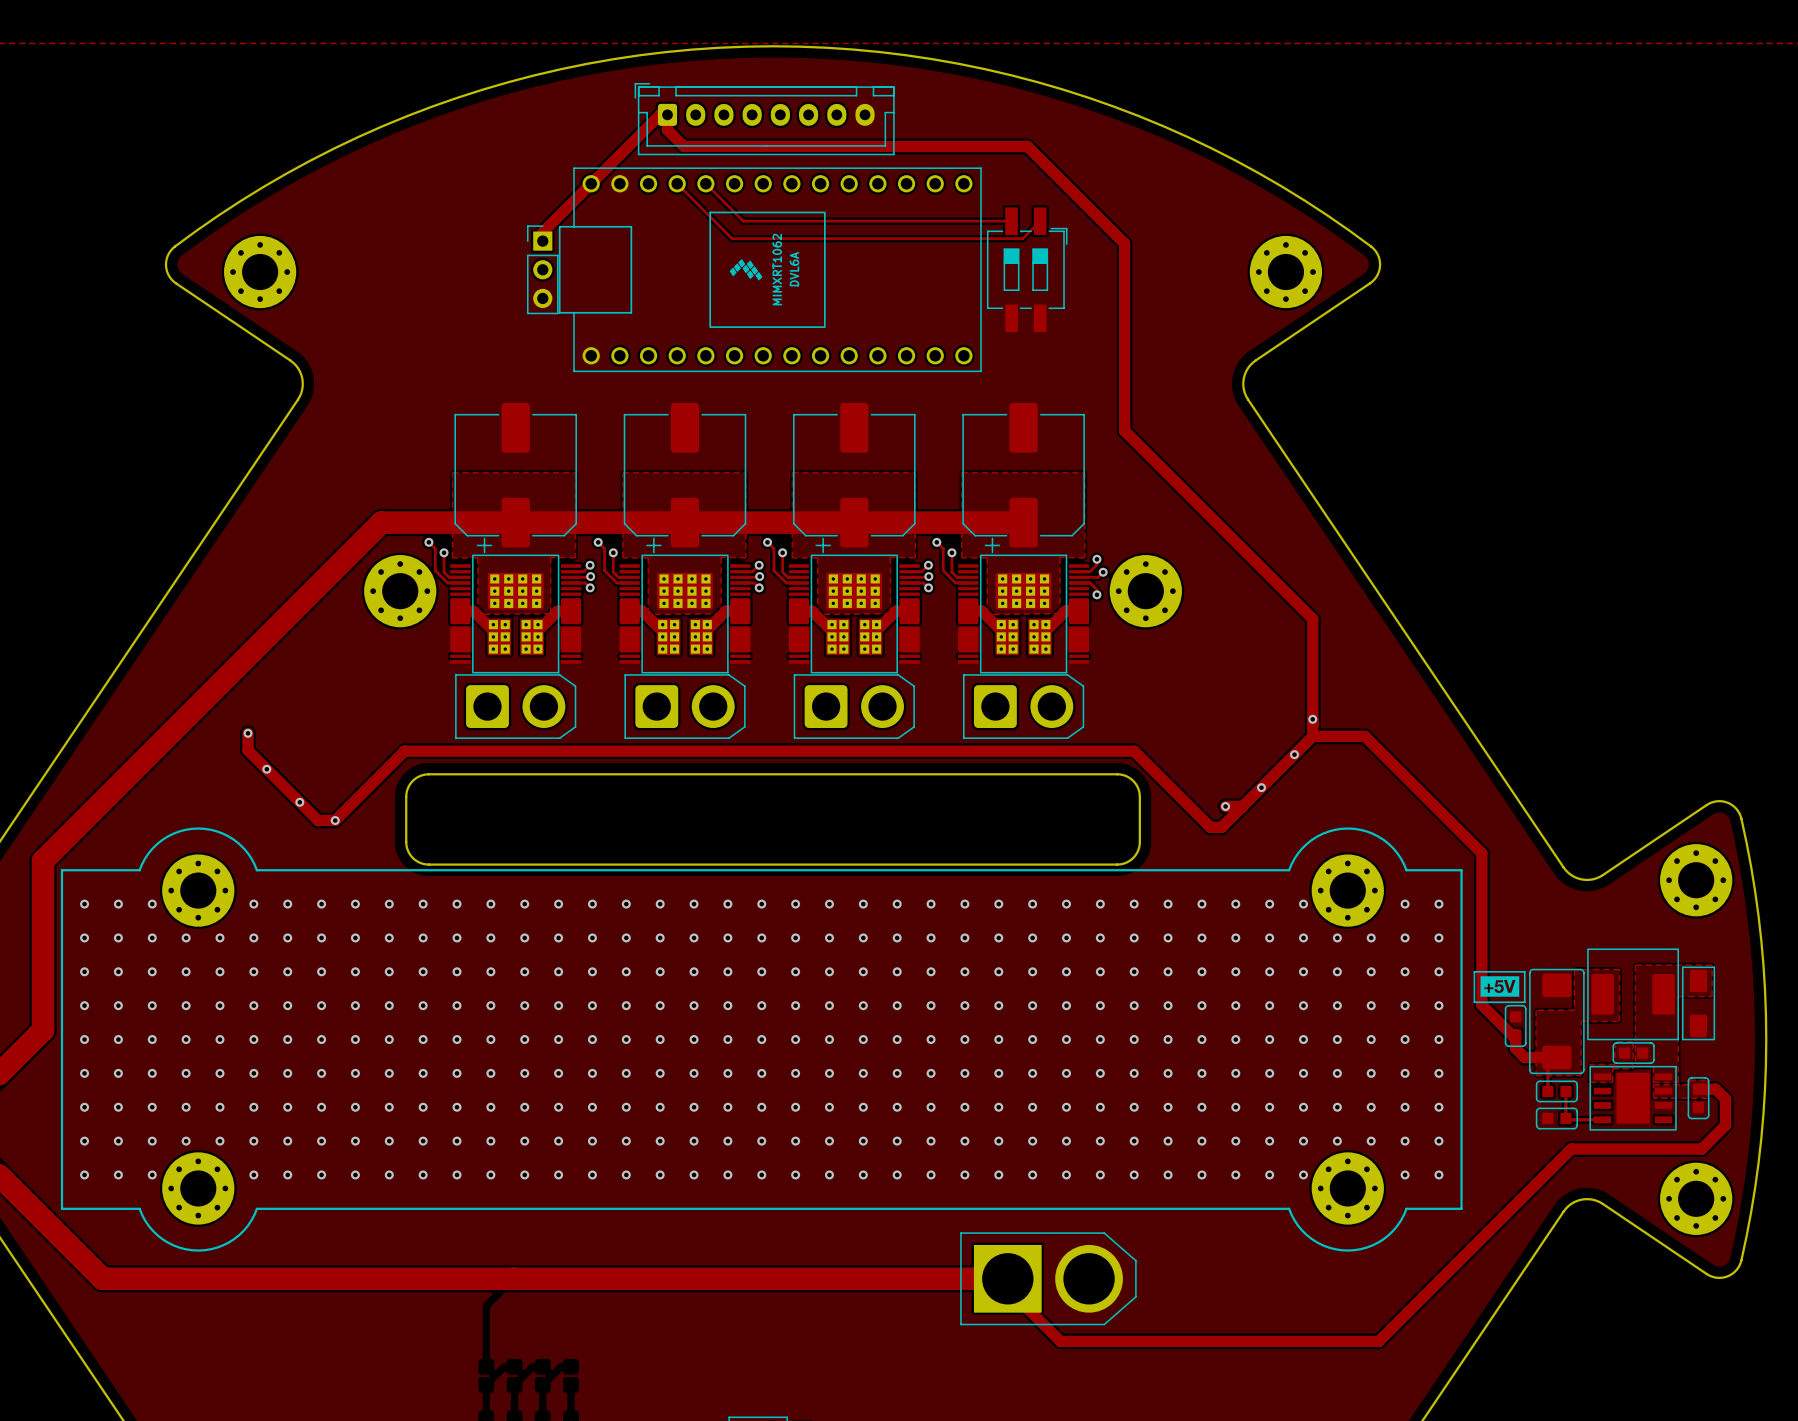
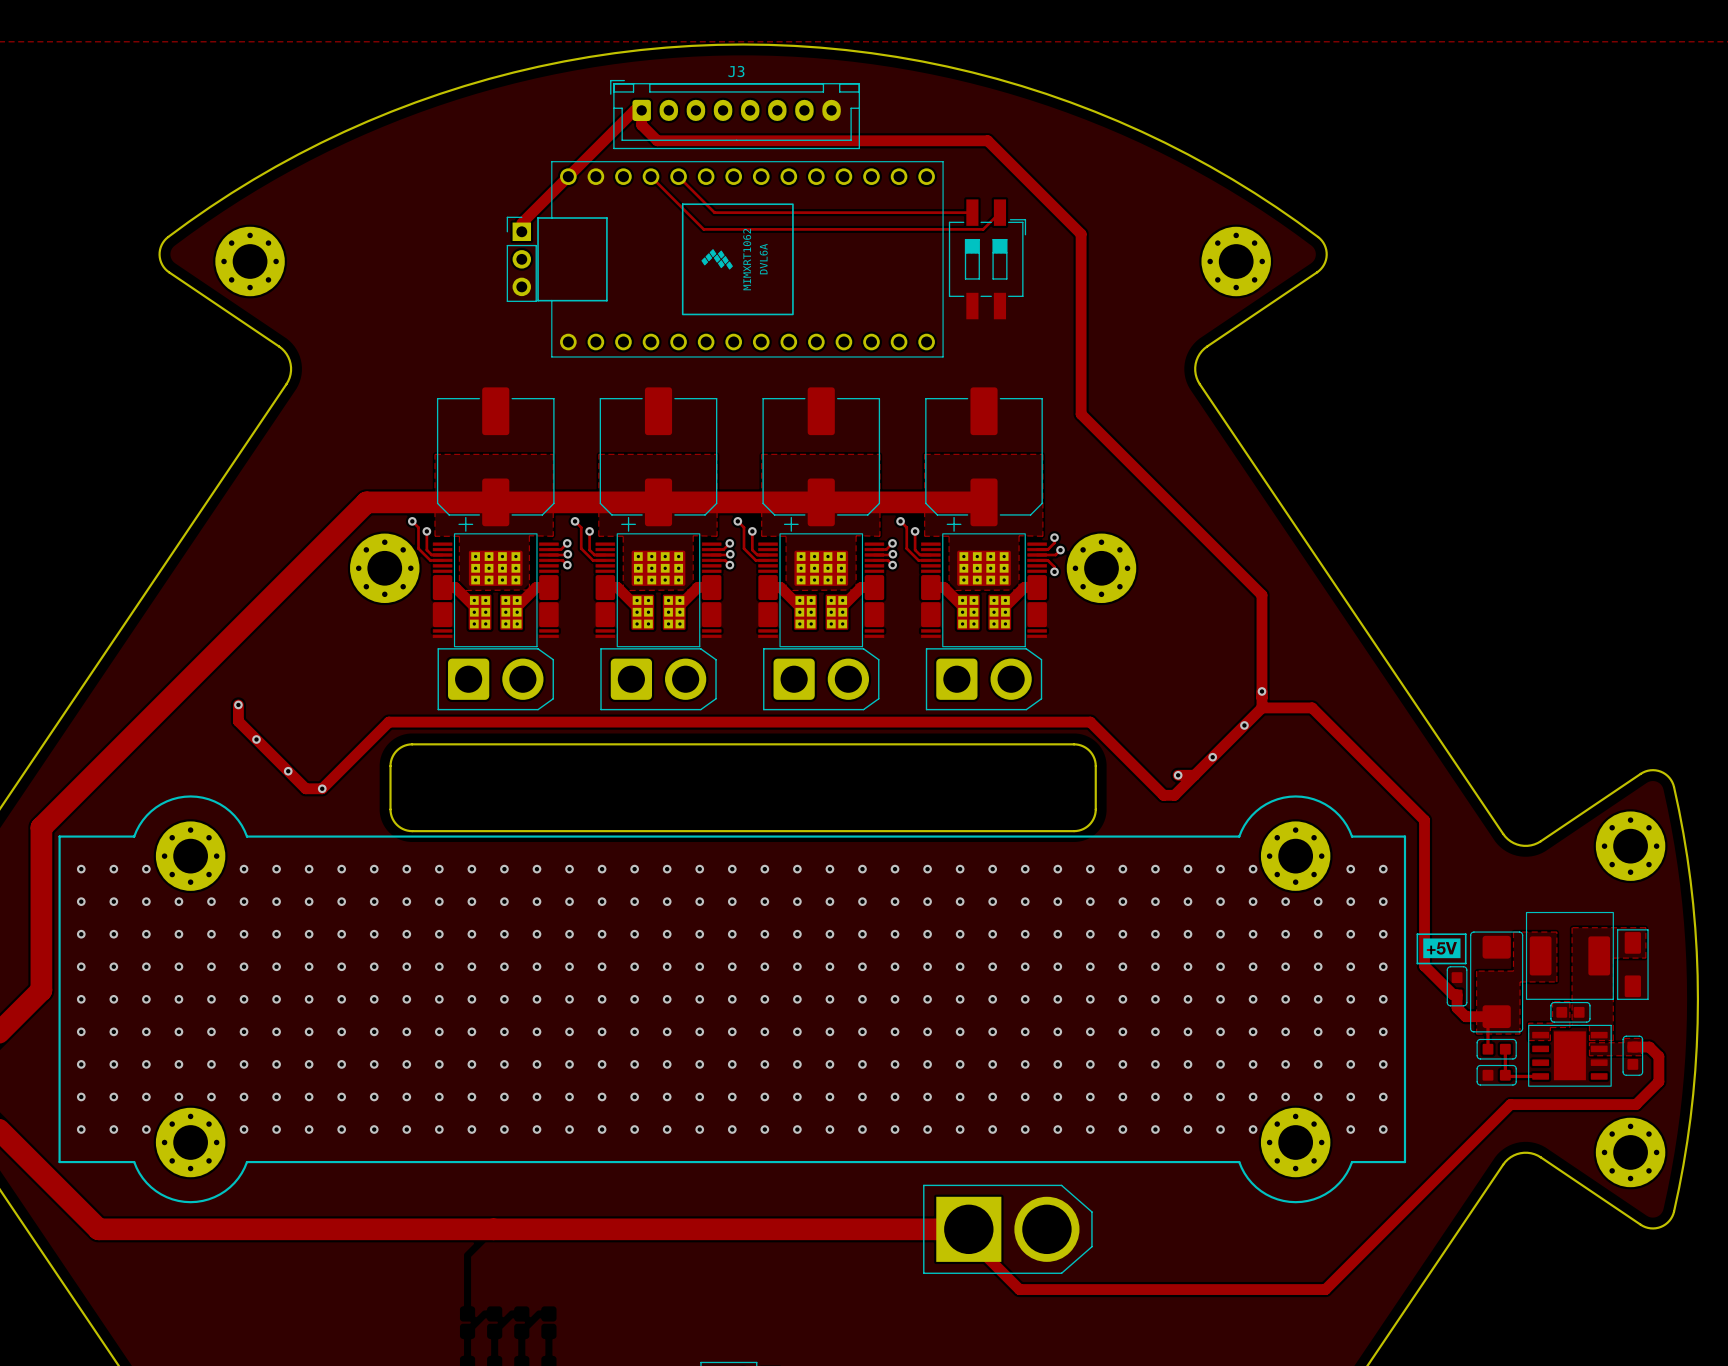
J3 name: none -> J3 (736, 71)

